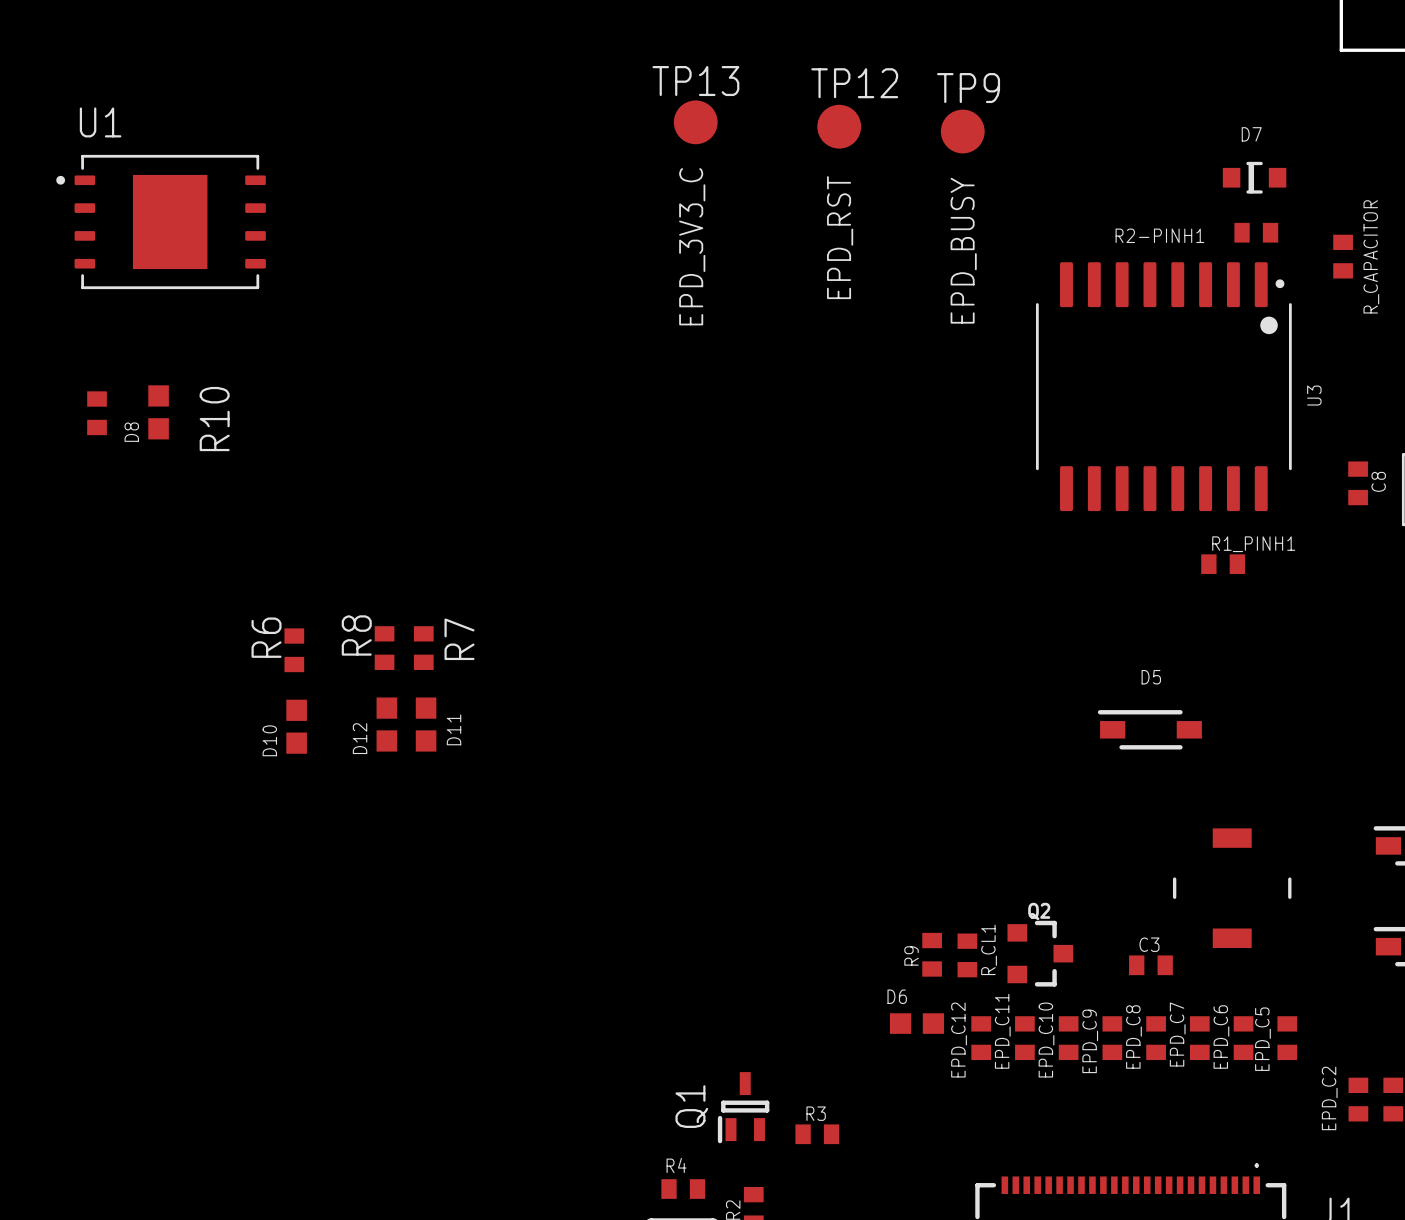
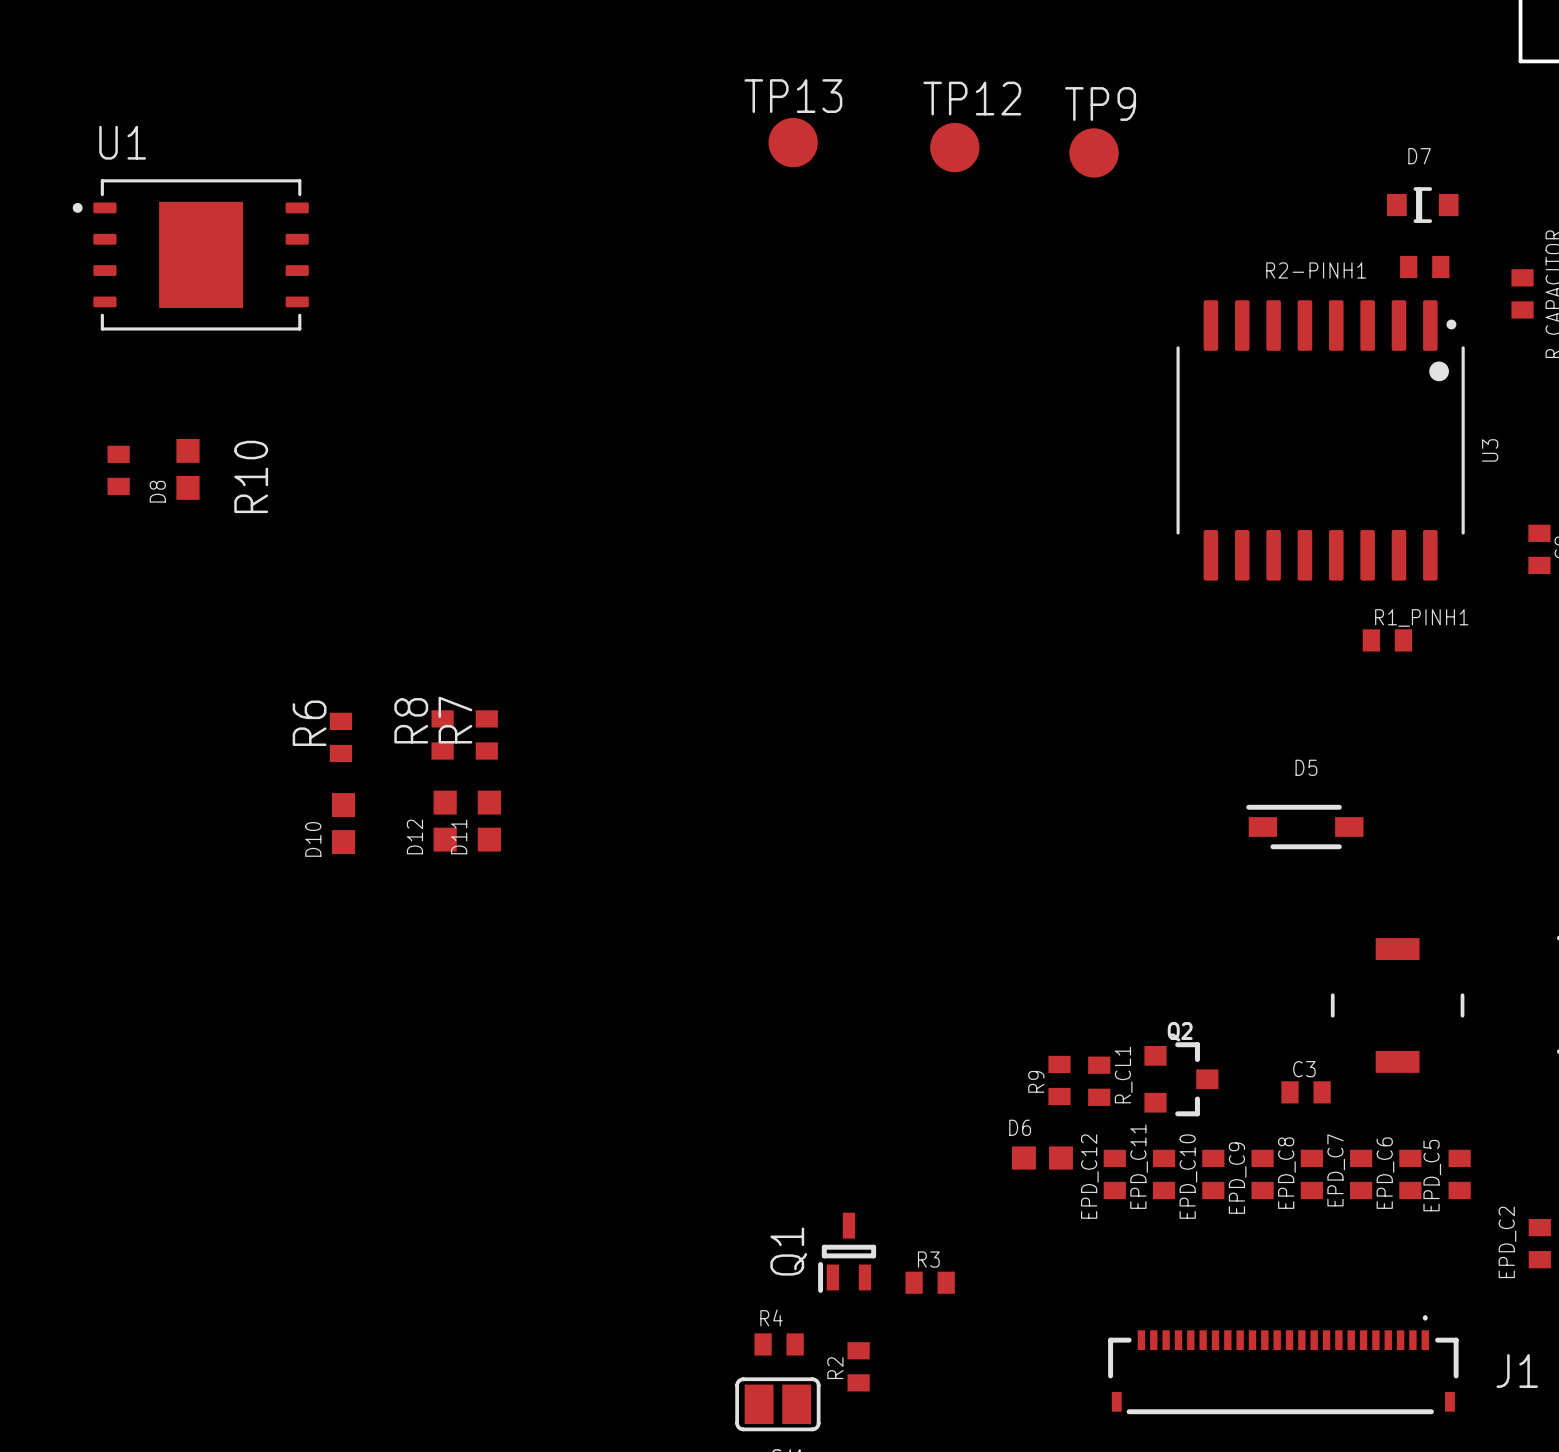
TP12 text: EPD_RST (840, 237) -> none
TP13 text: EPD_3V3_C (692, 246) -> none
TP9 text: EPD_BUSY (963, 250) -> none
R7 name position: R7 (459, 639) -> R7 (455, 720)
D11 name position: D11 (454, 729) -> D11 (459, 836)

